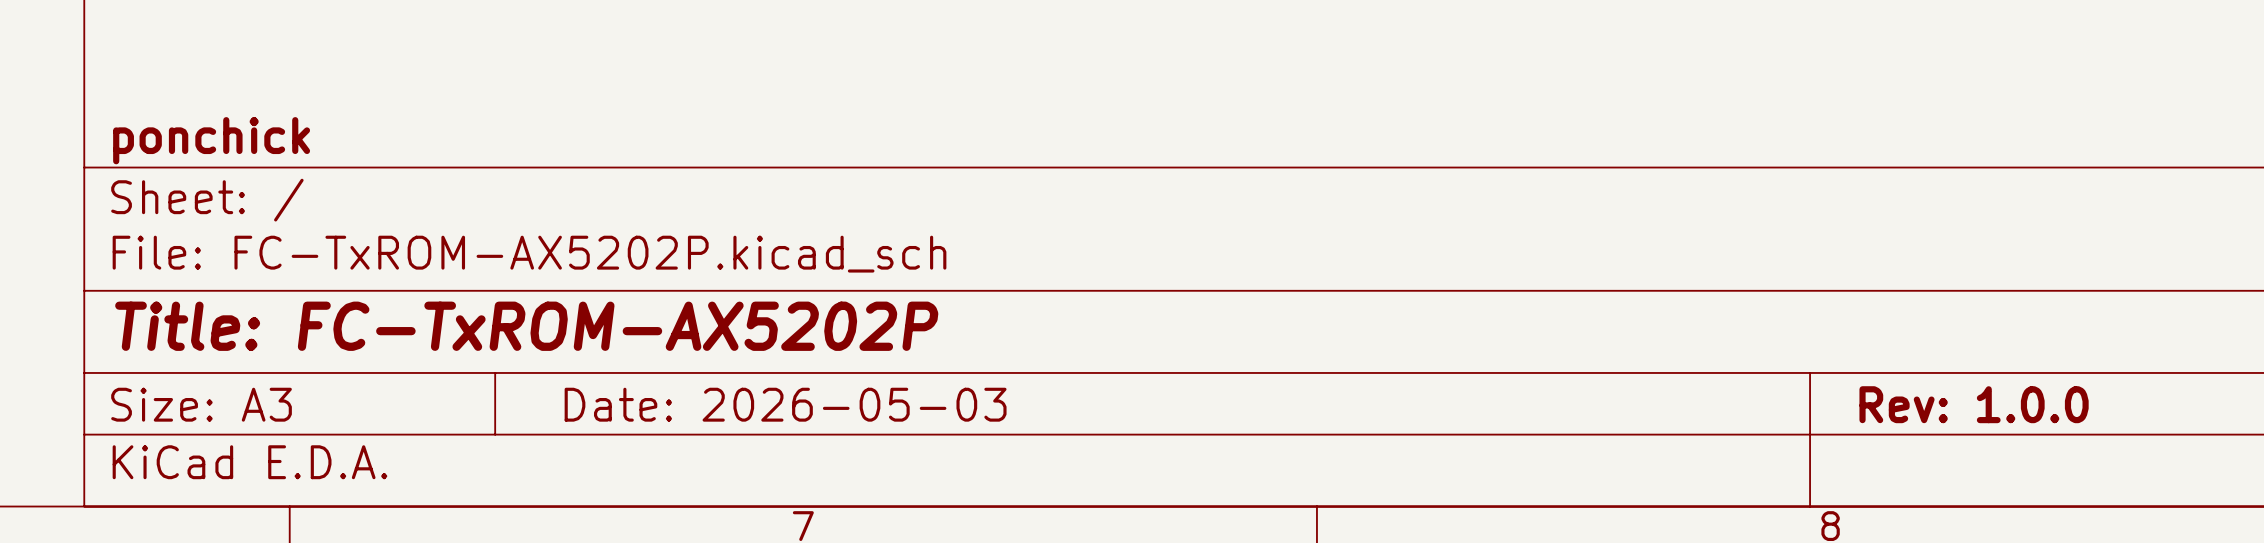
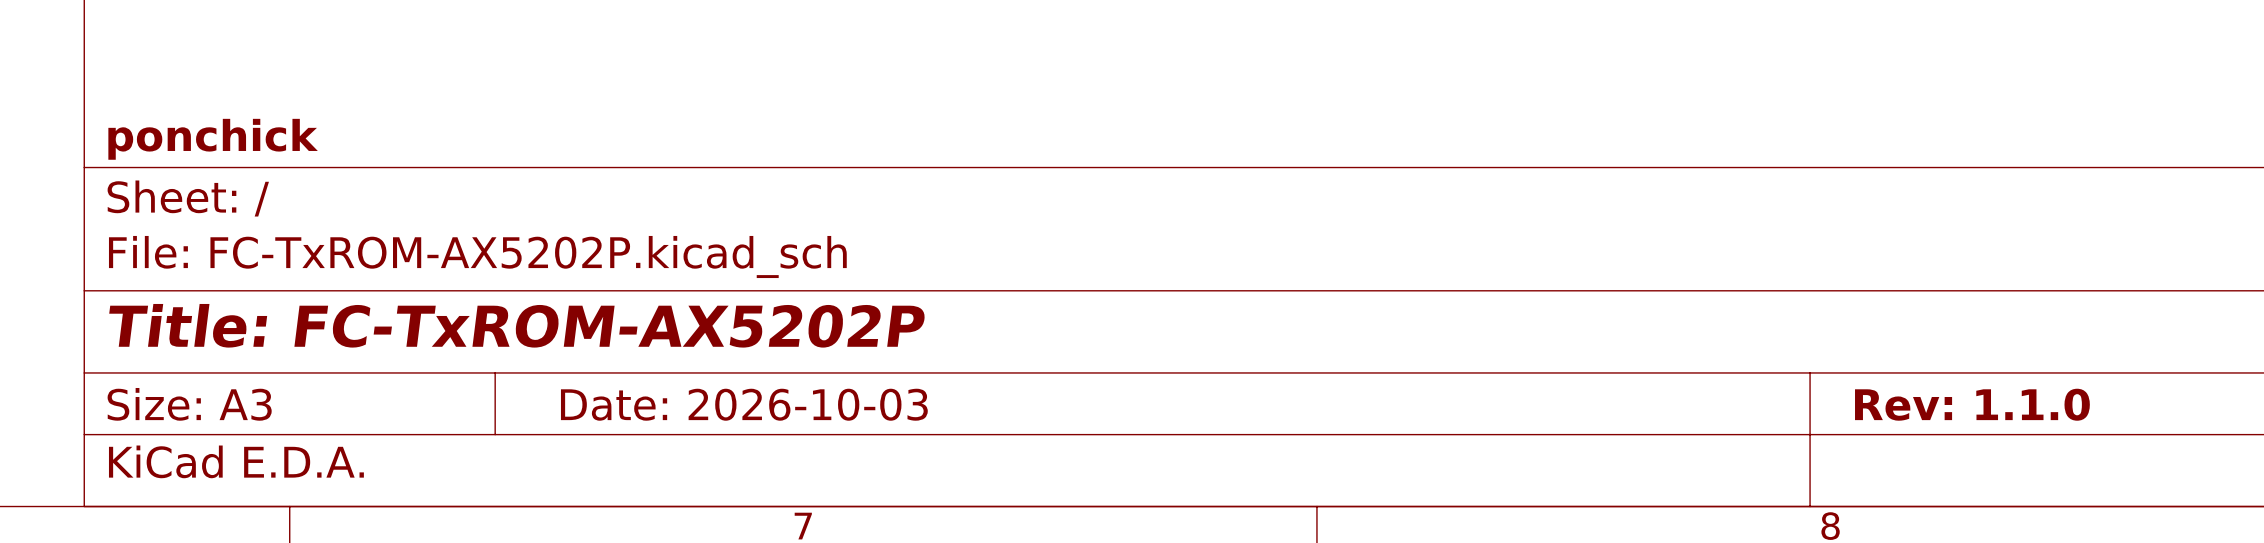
title block: Date: 2026-05-03 (785, 404) -> Date: 2026-10-03 (744, 404)
title block: Rev: 1.0.0 (1974, 404) -> Rev: 1.1.0 (1972, 404)

